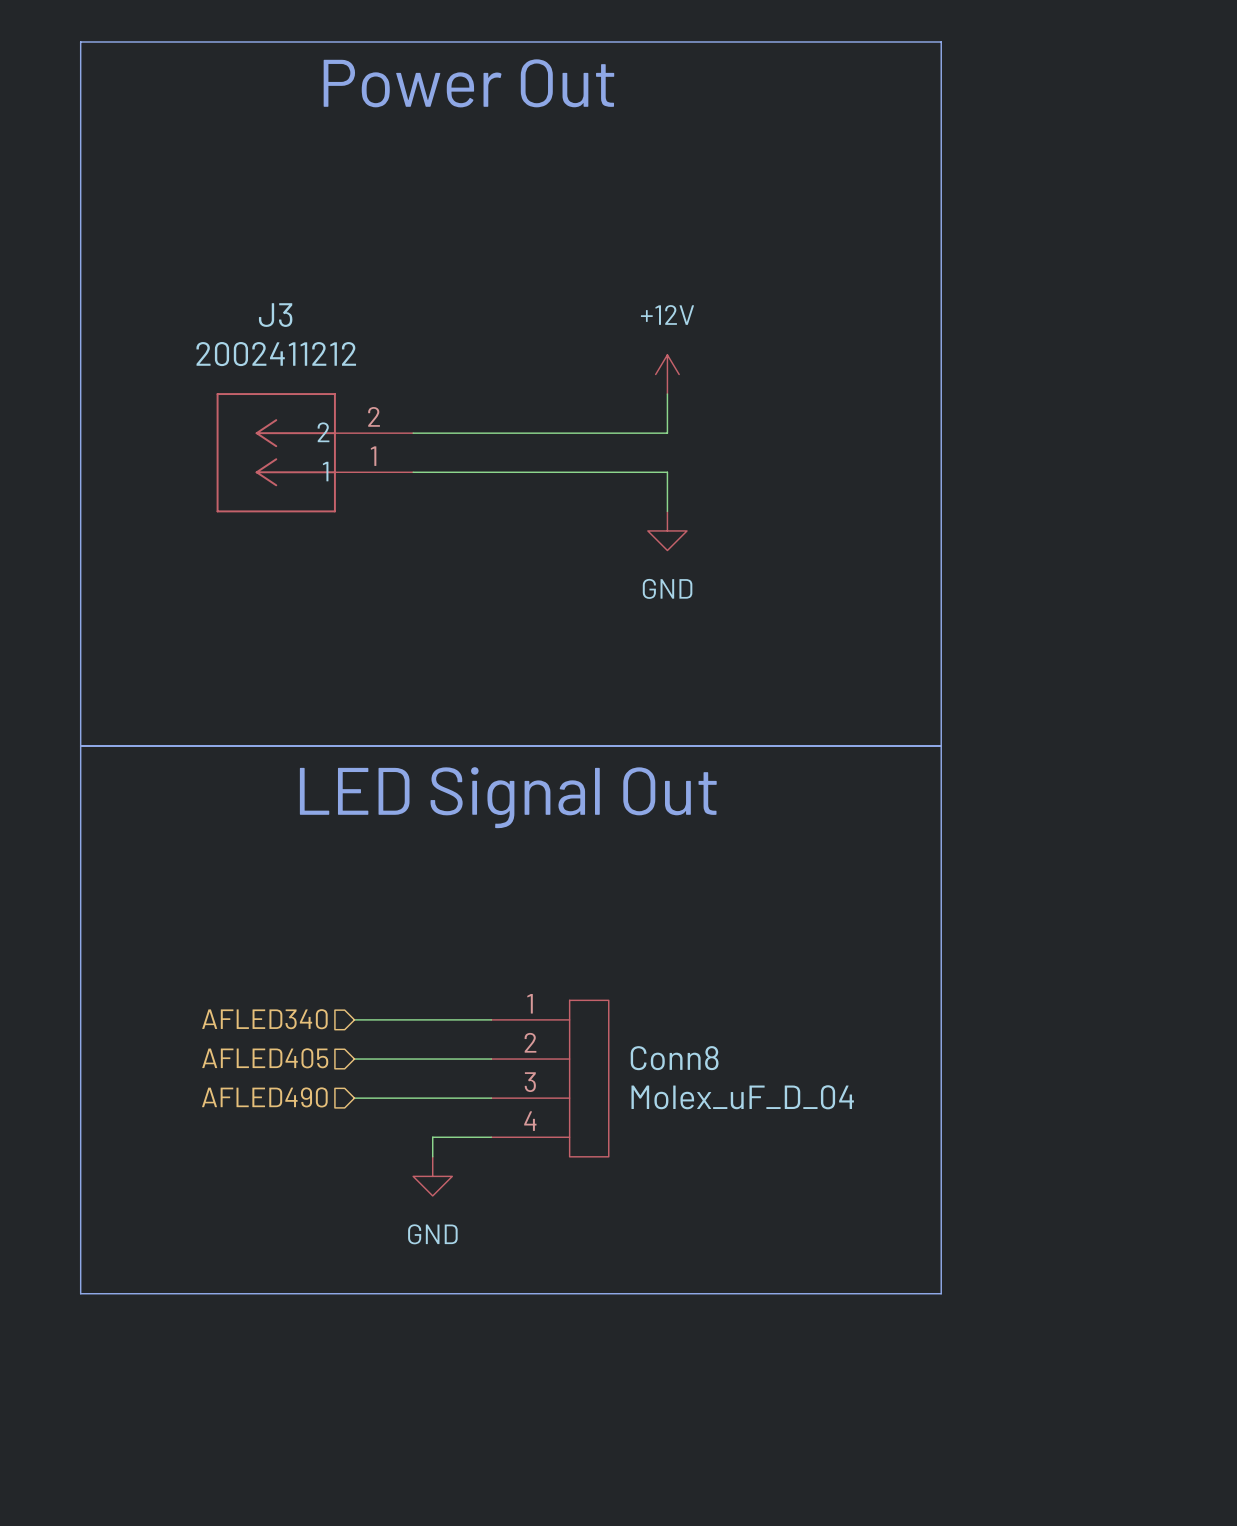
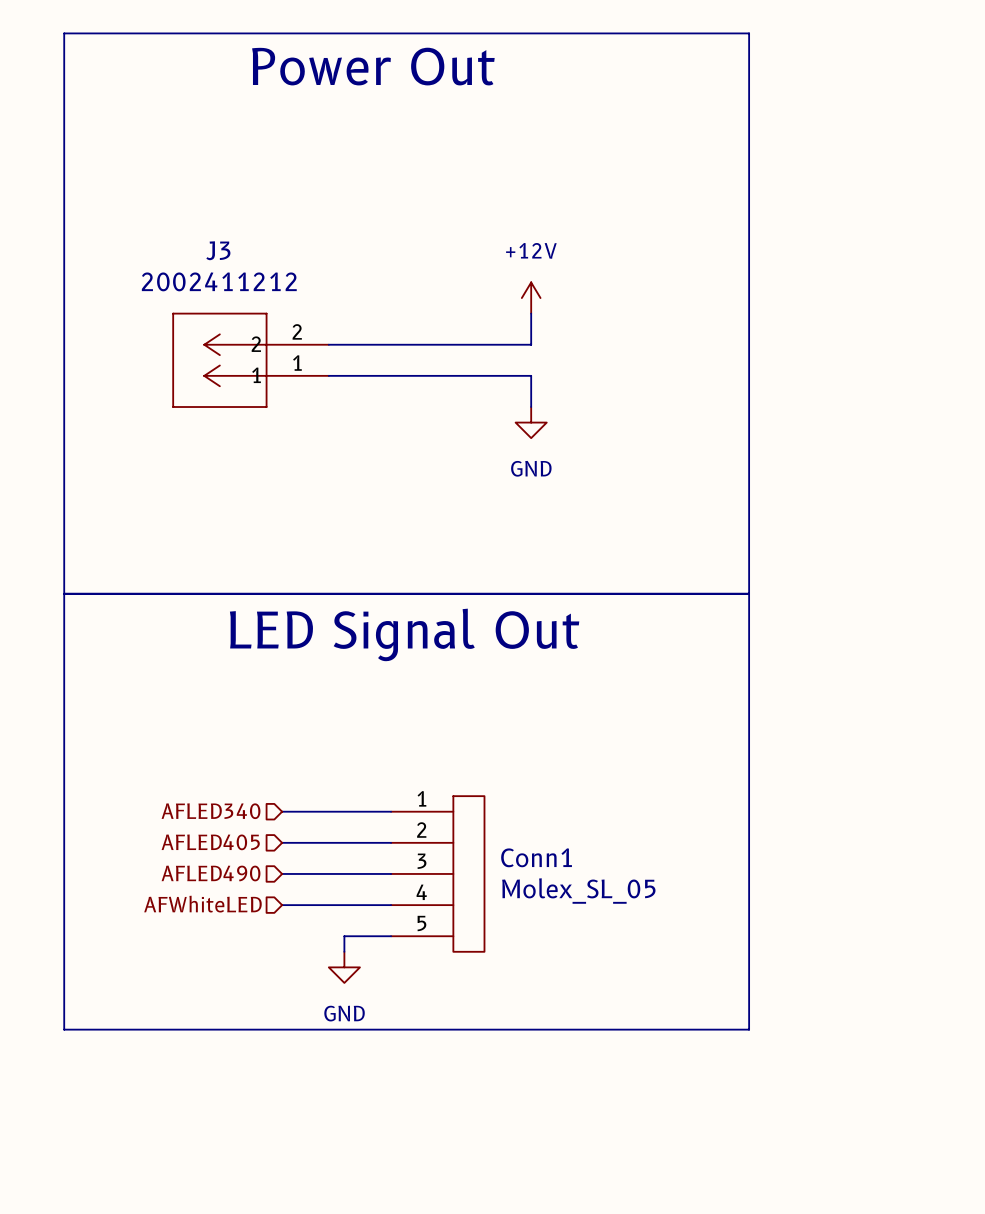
Conn8: Molex_uF_D_04 (550, 1078) -> none
Conn1: none -> Molex_SL_05 (437, 873)
hierarchical label: none -> AFWhiteLED (202, 904)
wire: (432, 1137) (432, 1156) -> (344, 905) (282, 905)
power symbol position: GND (432, 1176) -> GND (344, 967)
wire: none -> (391, 936) (344, 936) (344, 951)

